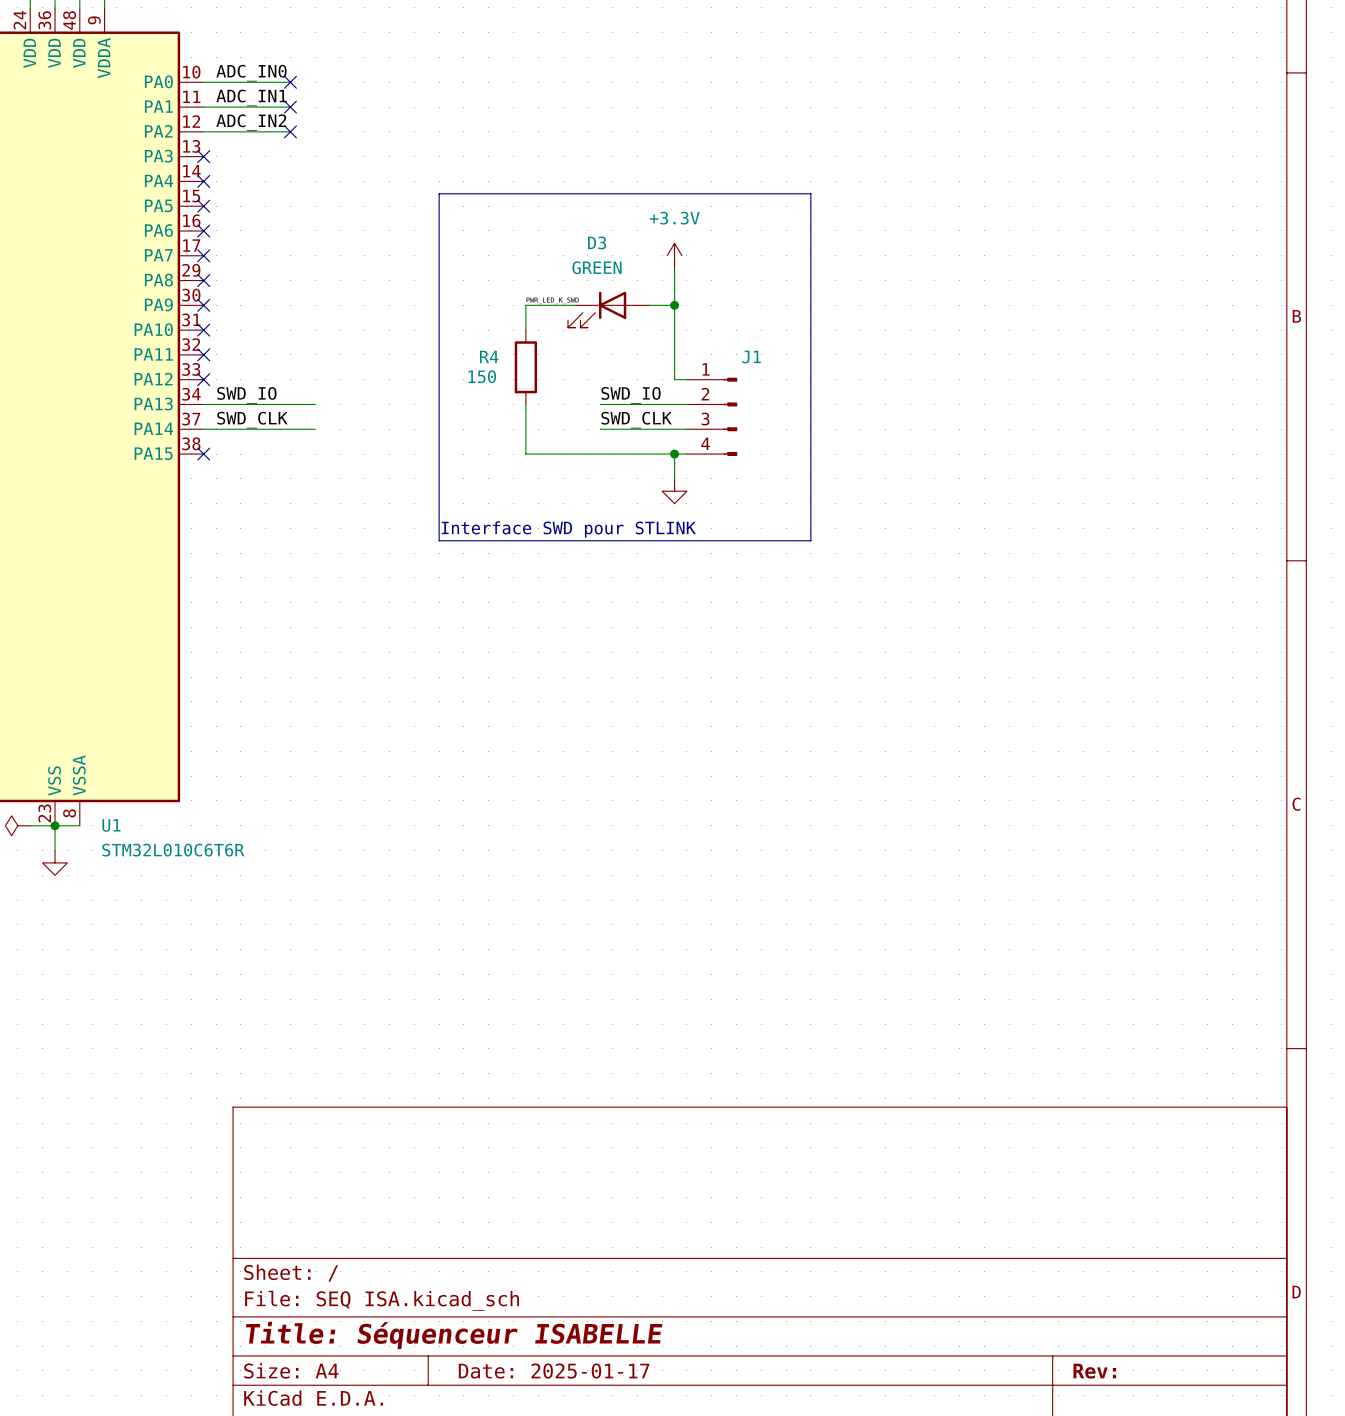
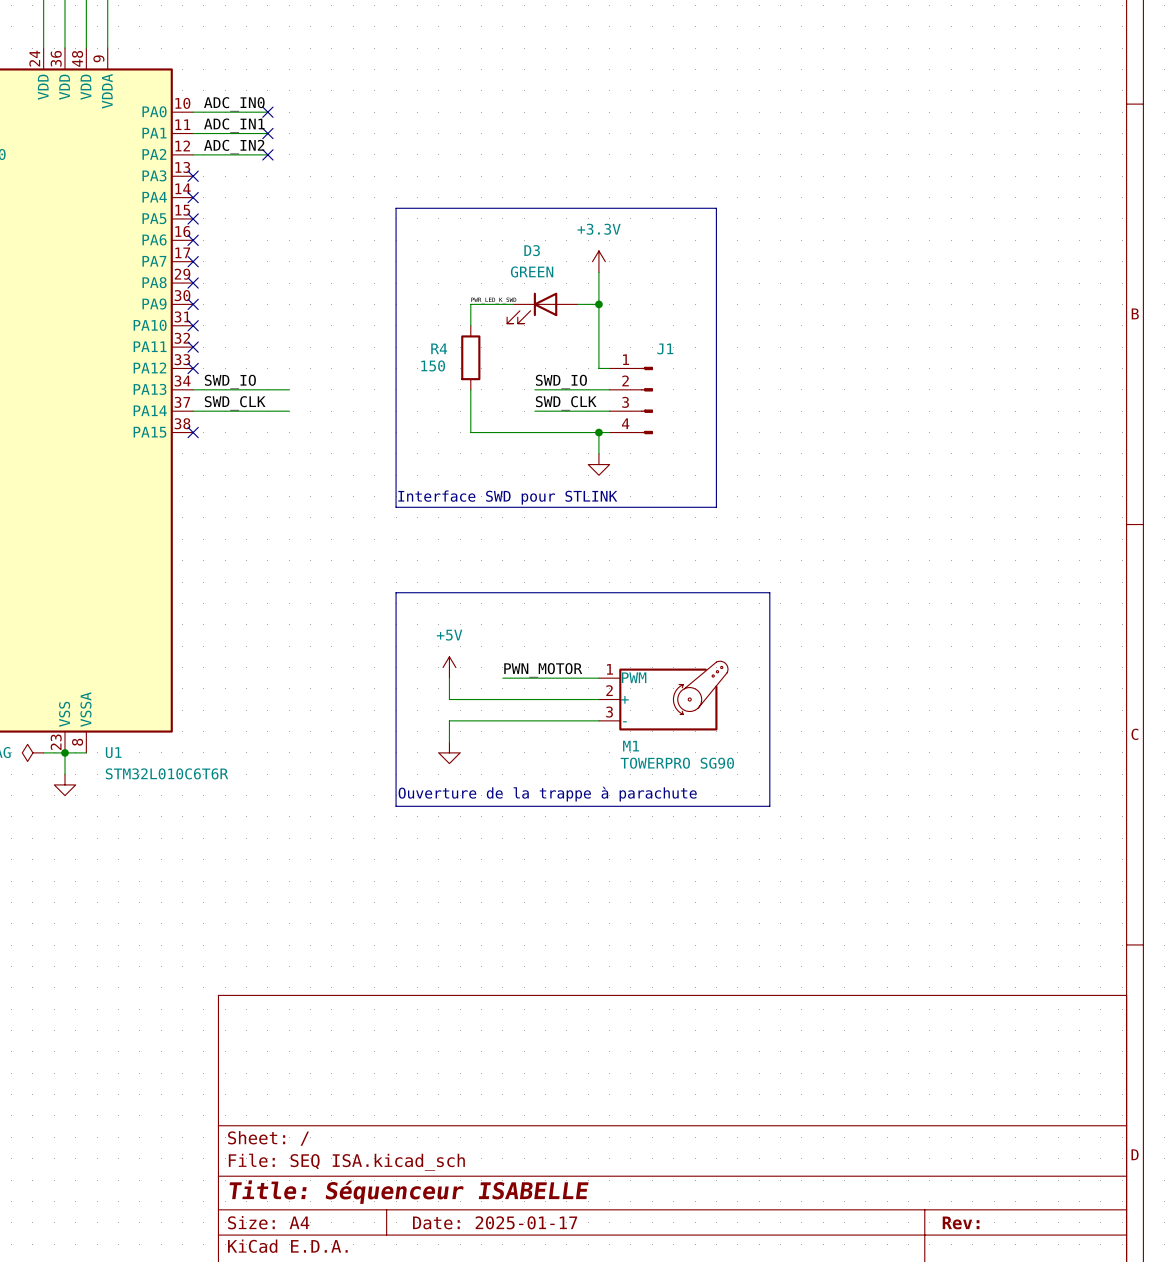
line: none -> (396, 592) (769, 592) (769, 806) (396, 806) (396, 592)
power symbol: none -> +5V (449, 667)
label: none -> PWN_MOTOR (543, 670)
wire: none -> (449, 678) (449, 699) (598, 699)
wire: none -> (502, 678) (598, 678)
M1: none -> TOWERPRO SG90 (663, 695)
wire: none -> (598, 720) (449, 720) (449, 742)
power symbol: none -> (449, 752)
text: none -> Ouverture de la trappe à parachute (547, 794)

